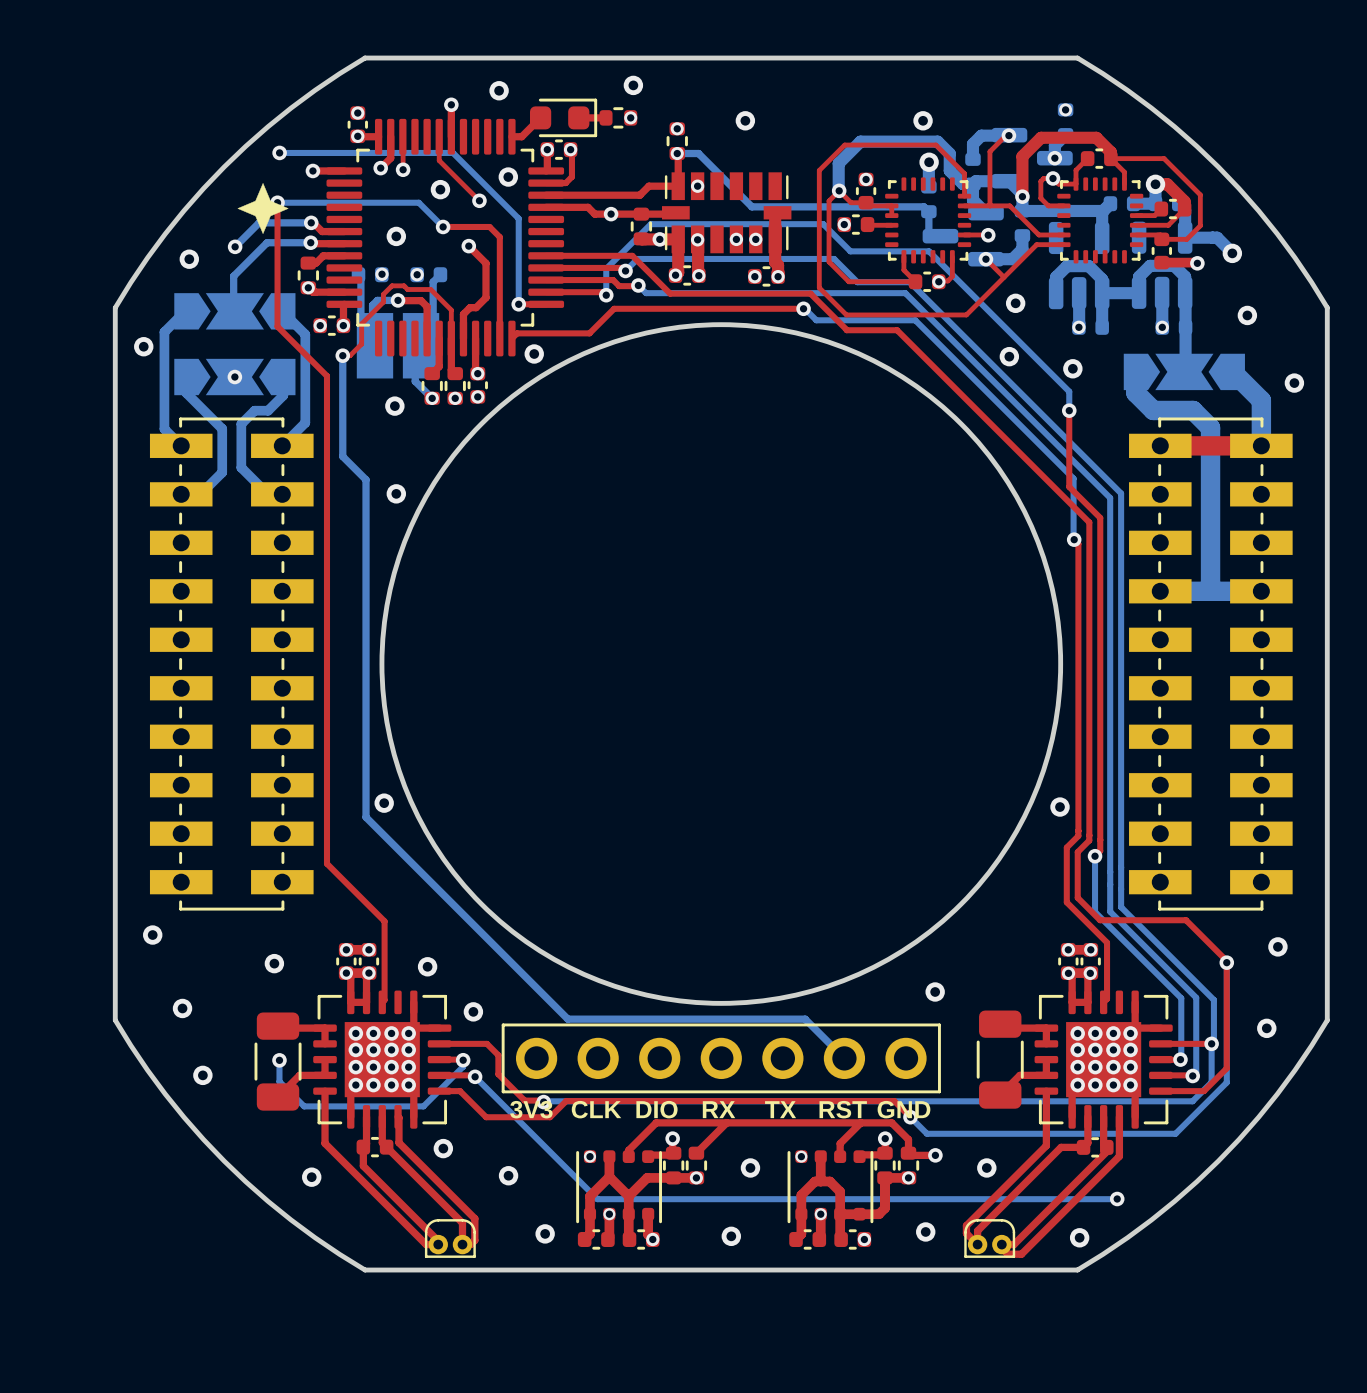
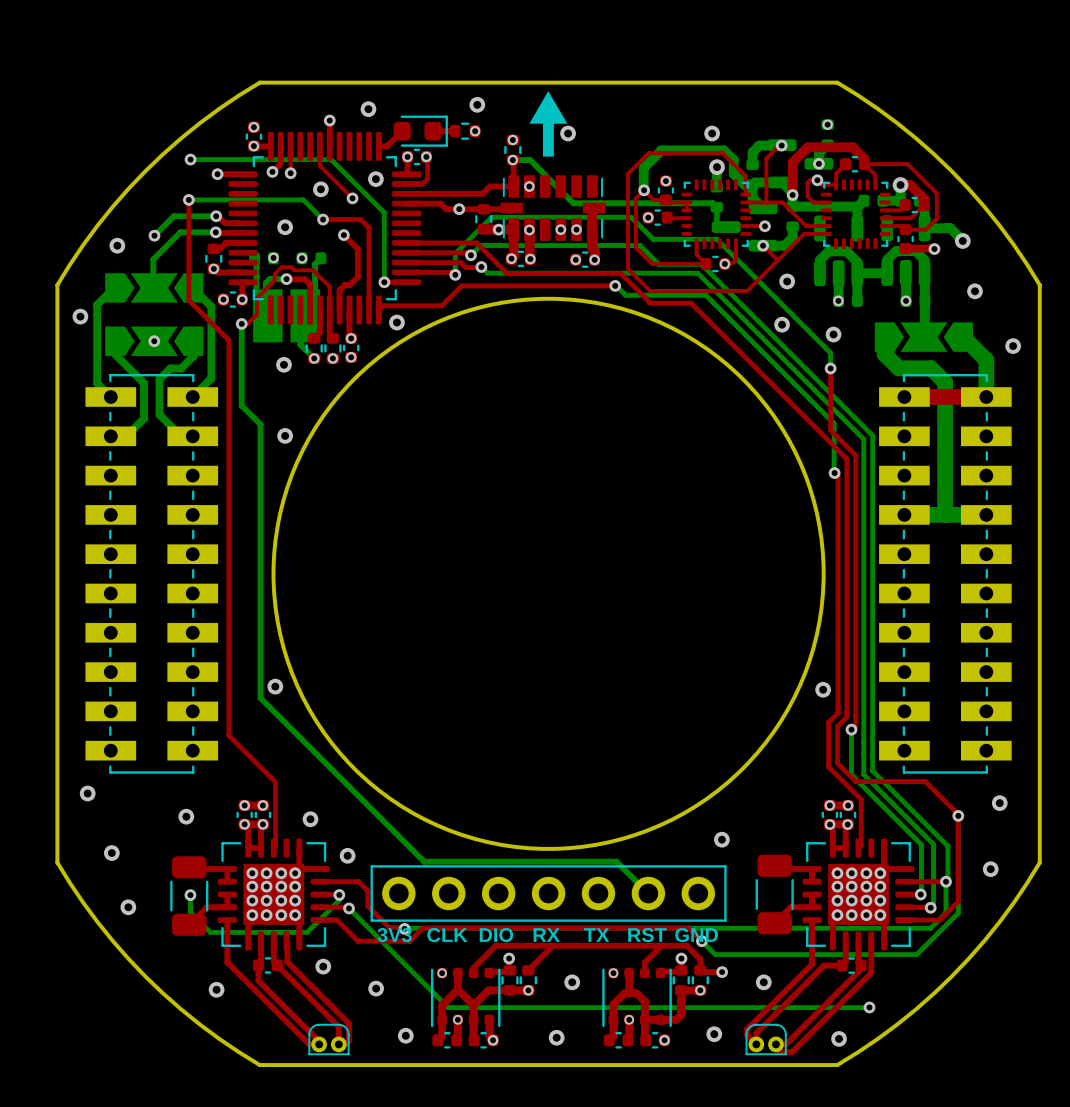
drawing: none -> [529, 91, 568, 157]
drawing: [237, 183, 289, 234] -> none

